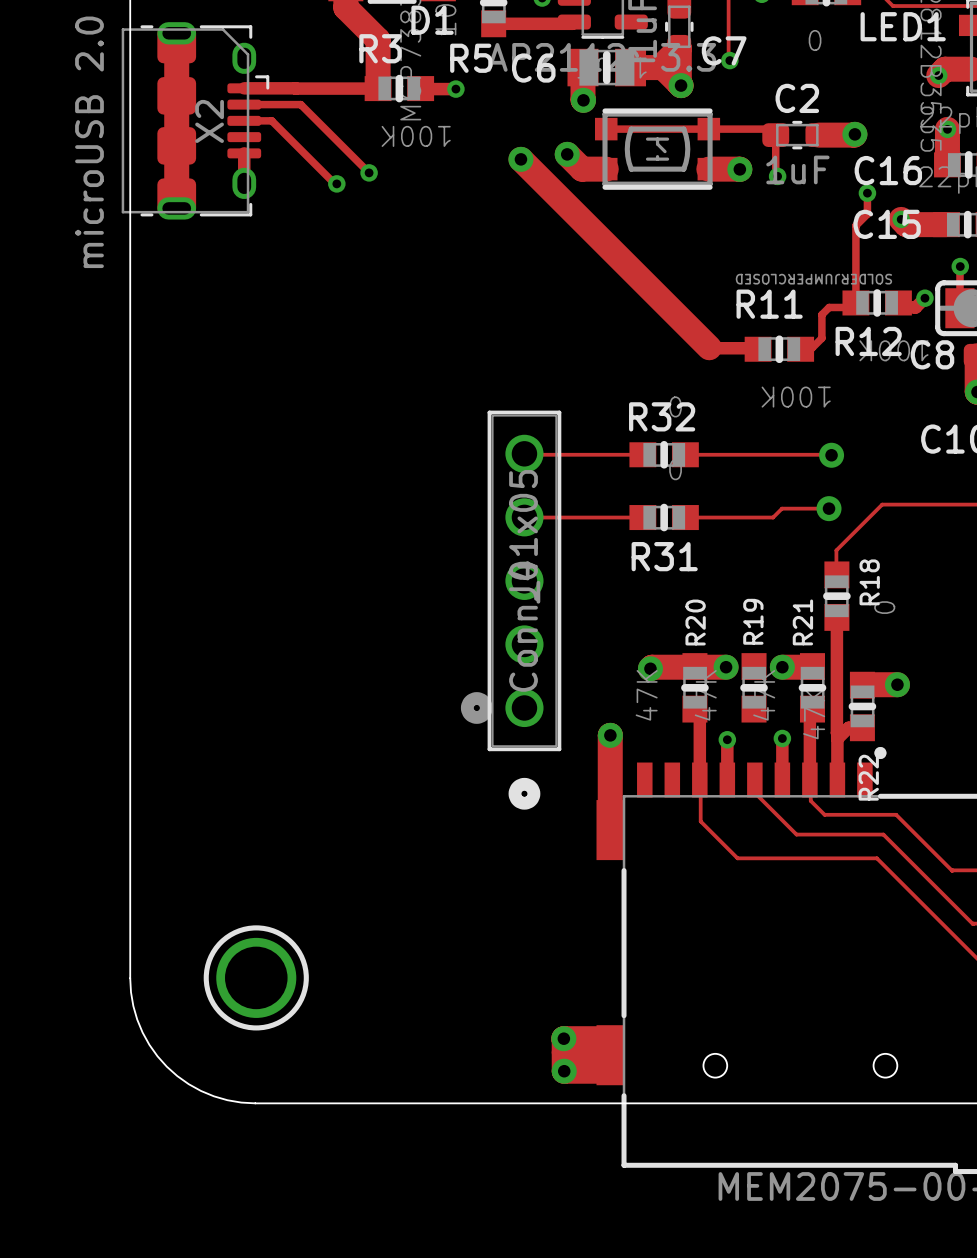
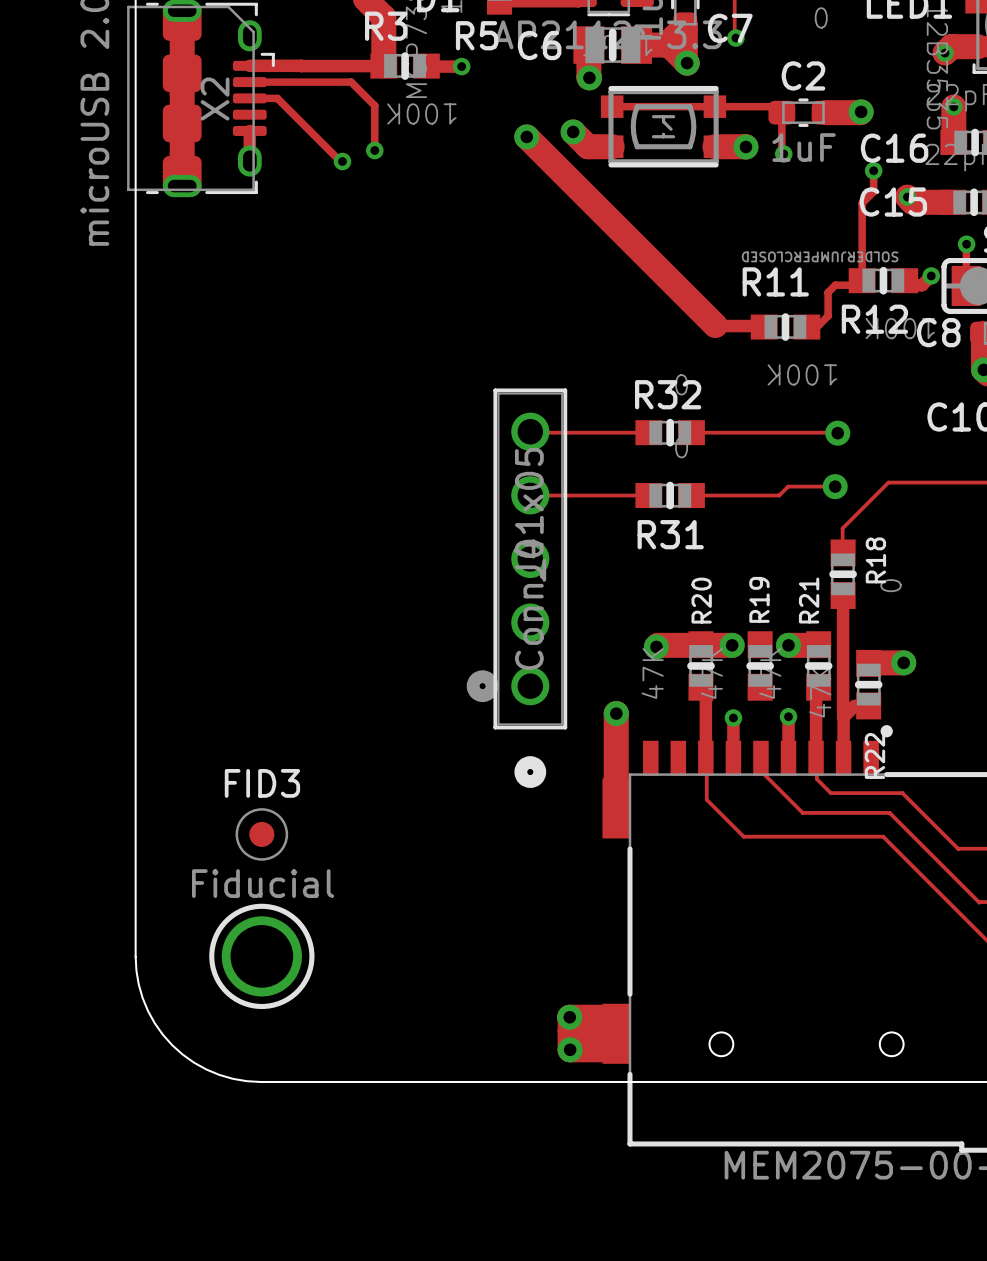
track: (300, 104) (369, 172) -> (306, 82) (351, 82) (374, 105) (374, 150)
FID3: none -> Fiducial (261, 834)

